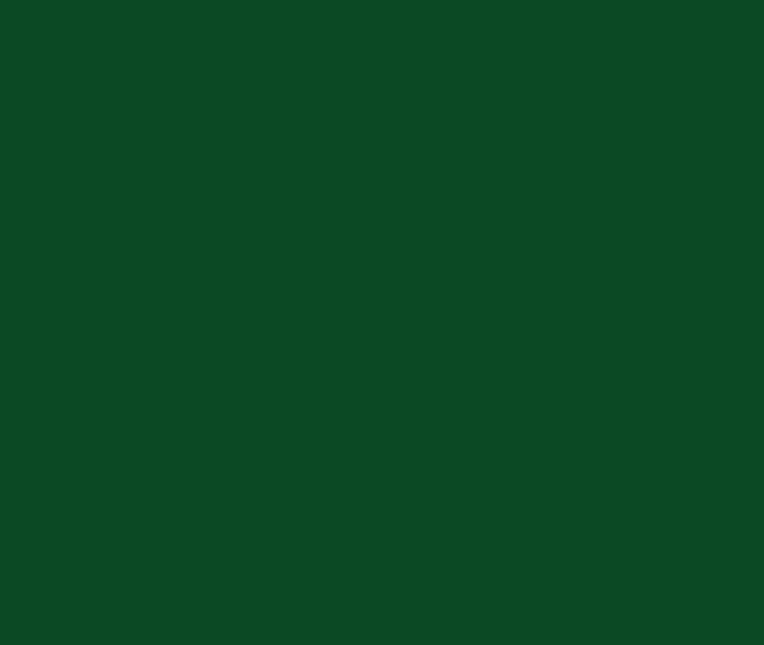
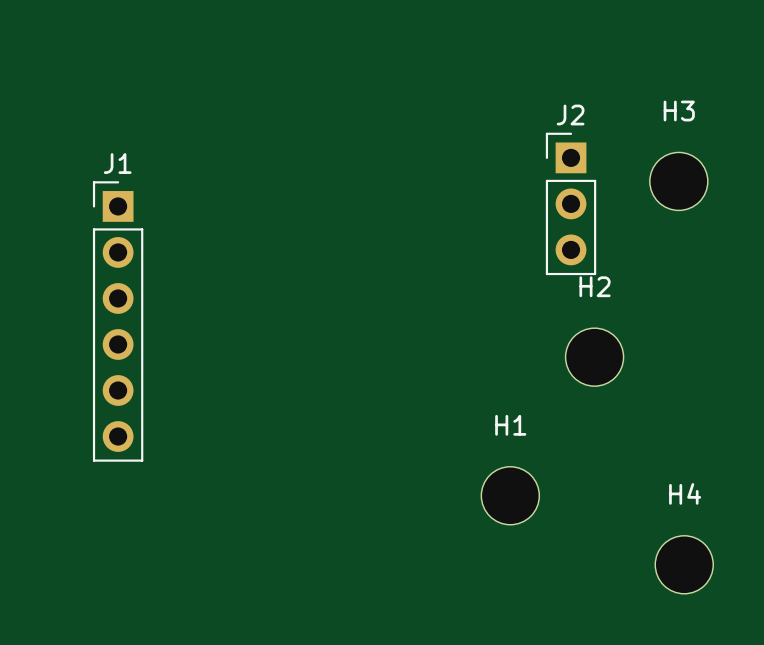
H3: none -> (678, 181)
J2: none -> (571, 203)
J1: none -> (118, 321)
H2: none -> (594, 357)
H1: none -> (510, 495)
H4: none -> (684, 564)

